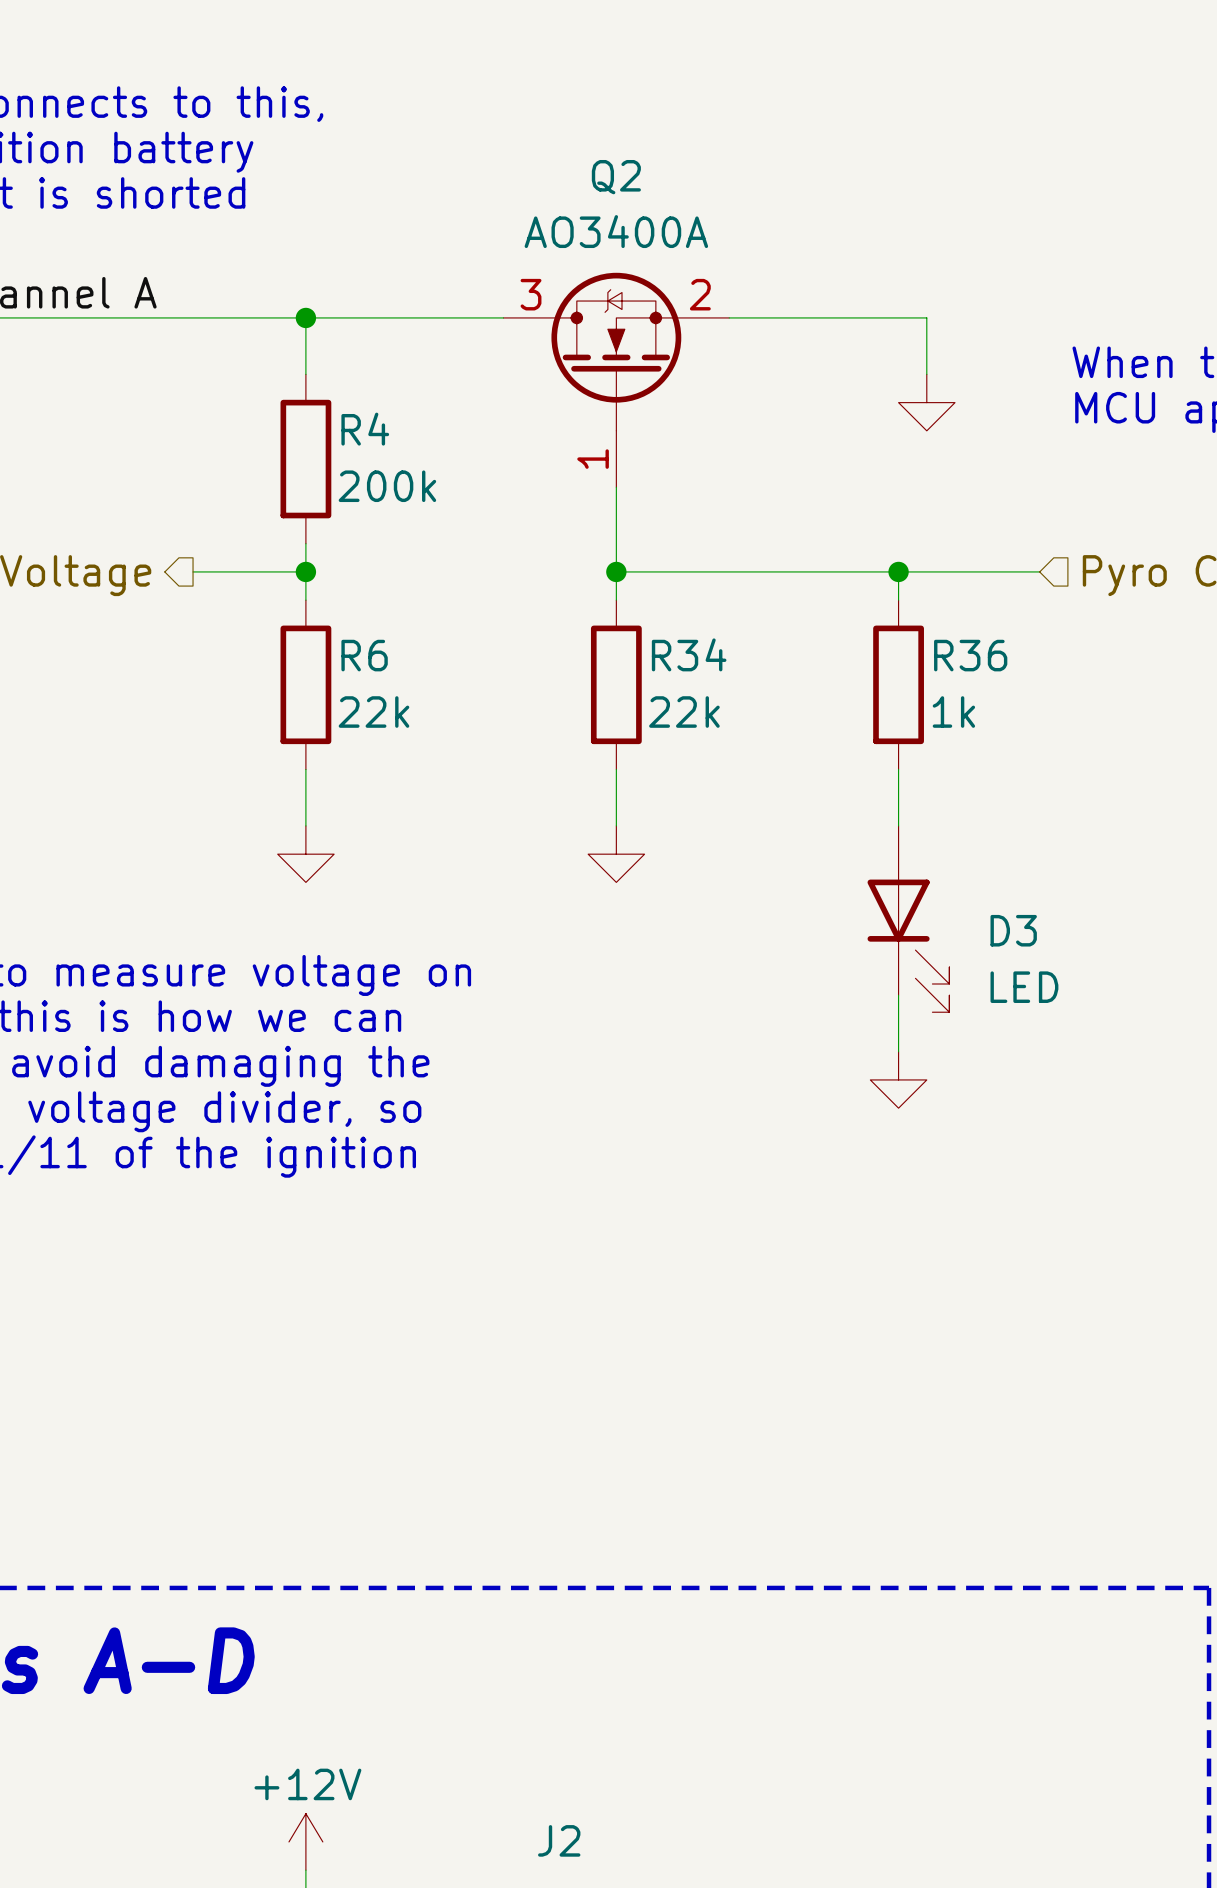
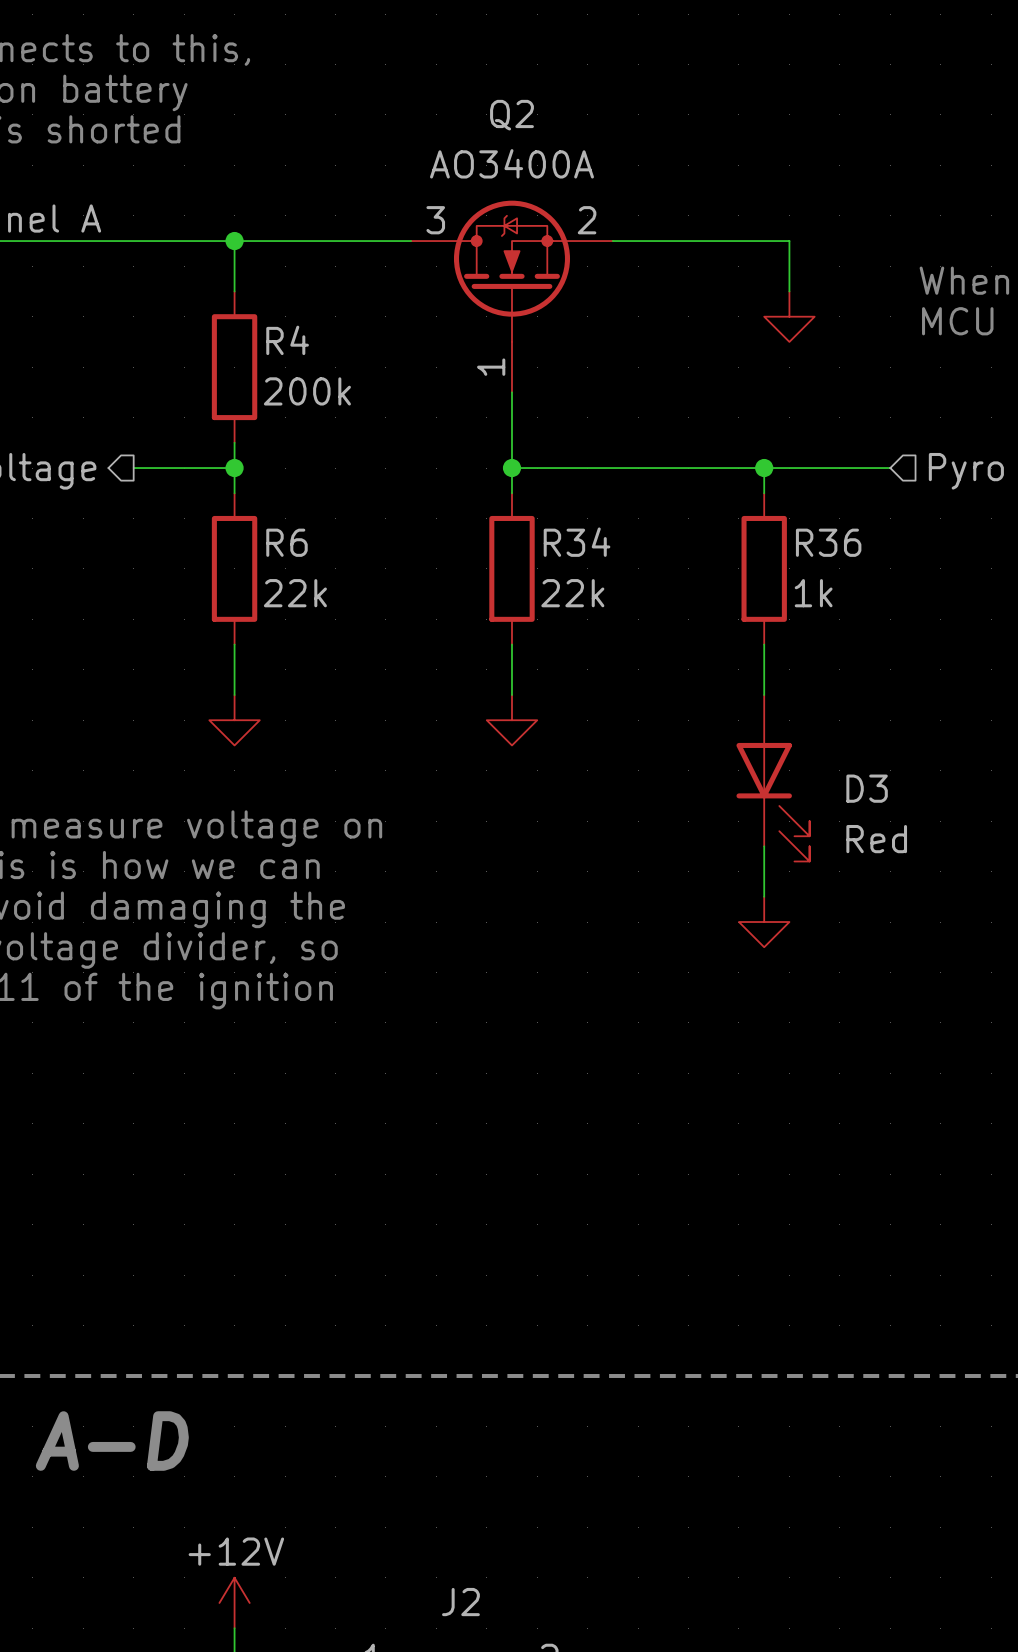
D3 value: LED (1024, 987) -> Red (876, 839)

